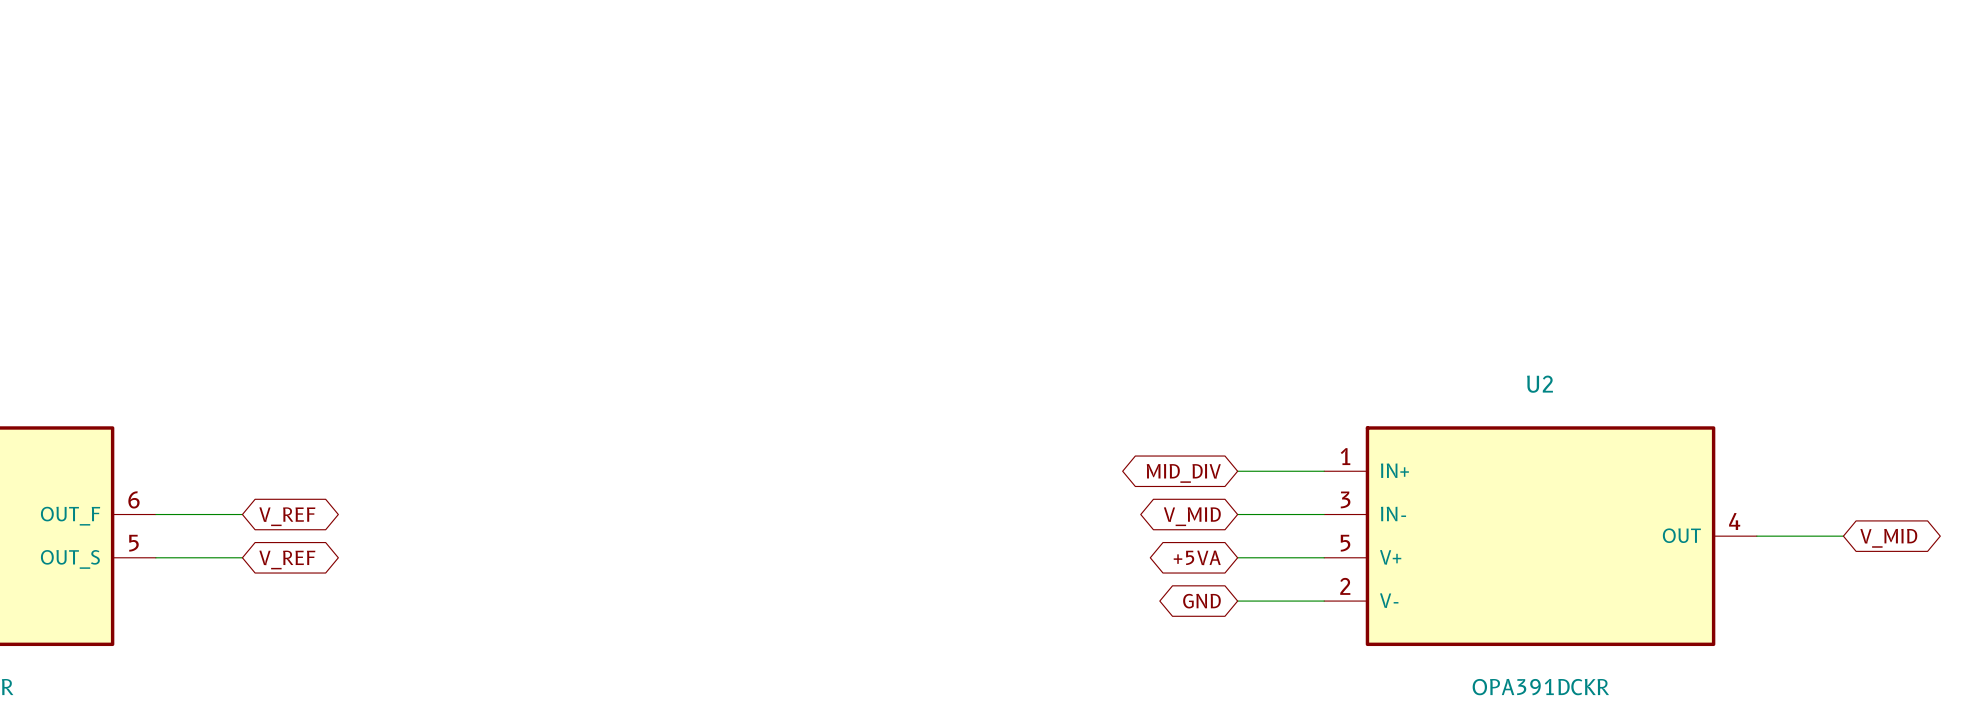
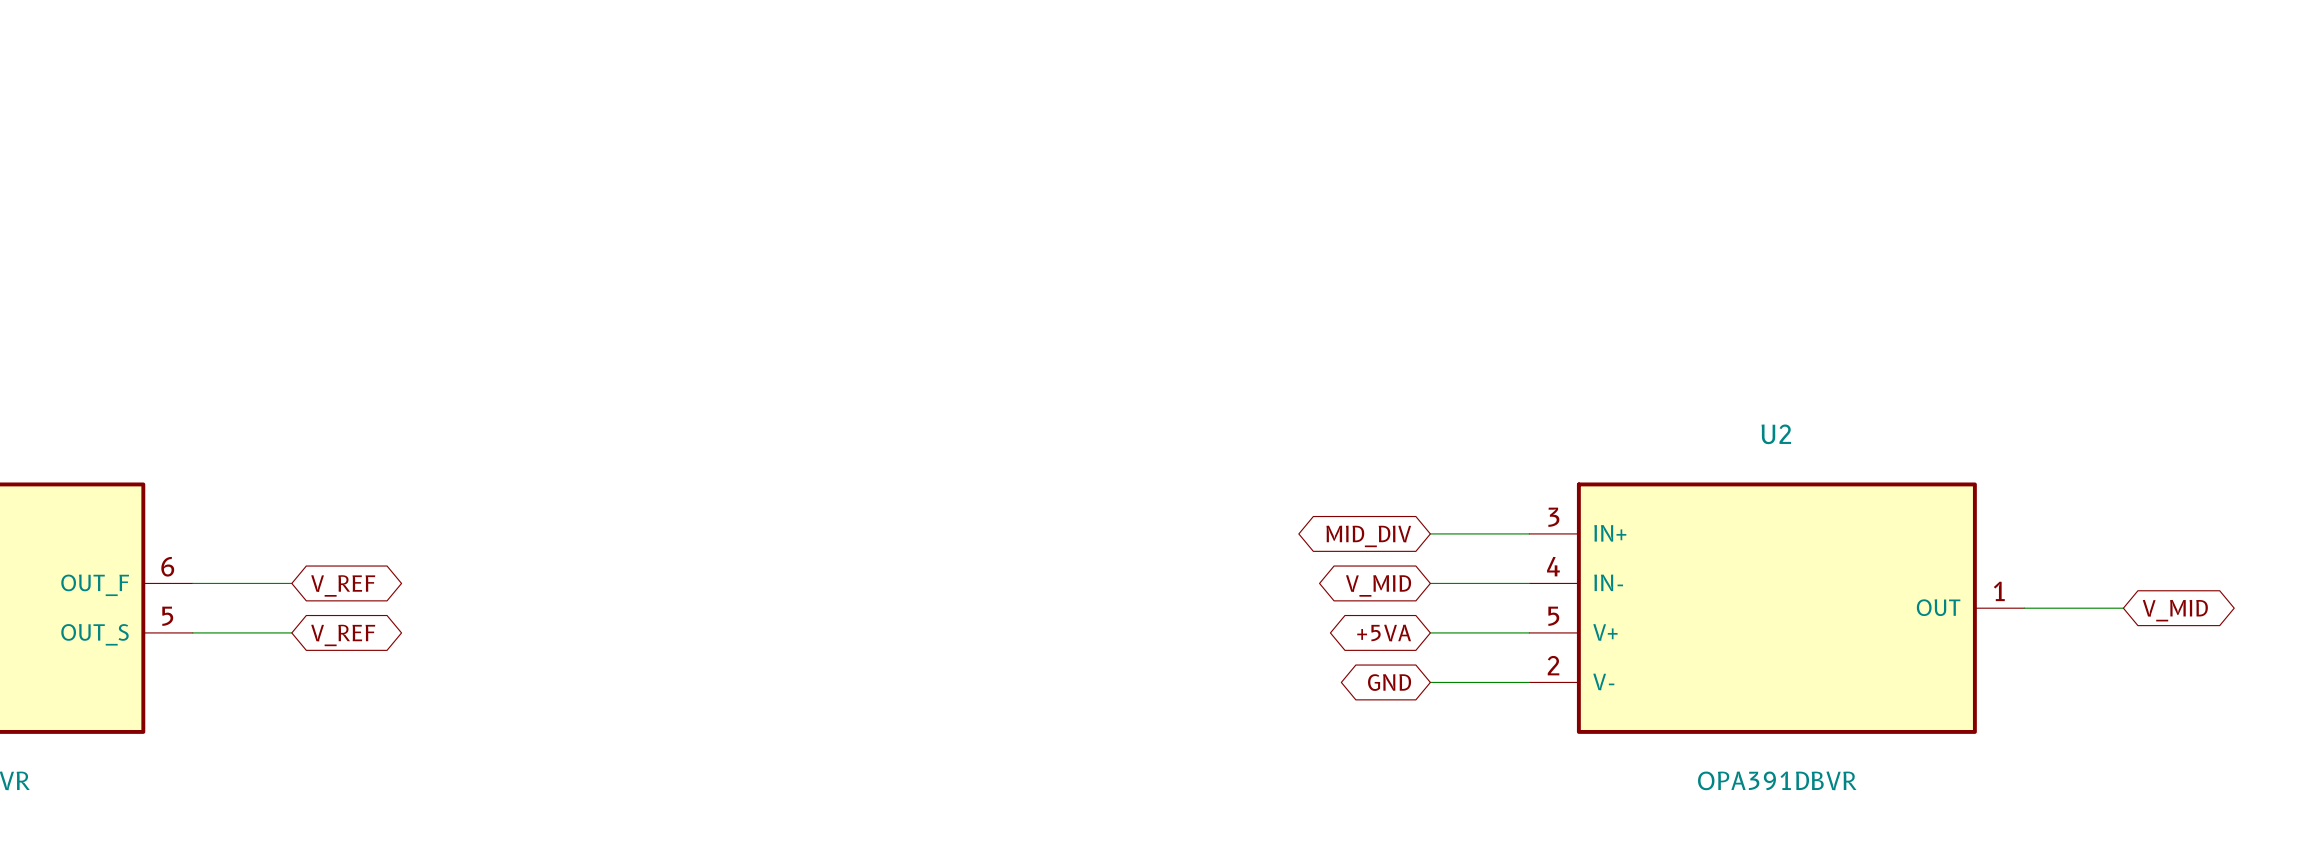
U2 pin number: 1 (1345, 456) -> 3 (1553, 517)
U2 pin number: 3 (1345, 499) -> 4 (1553, 566)
U2 pin number: 4 (1734, 521) -> 1 (1999, 591)
U2 value: OPA391DCKR (1540, 687) -> OPA391DBVR (1777, 780)

